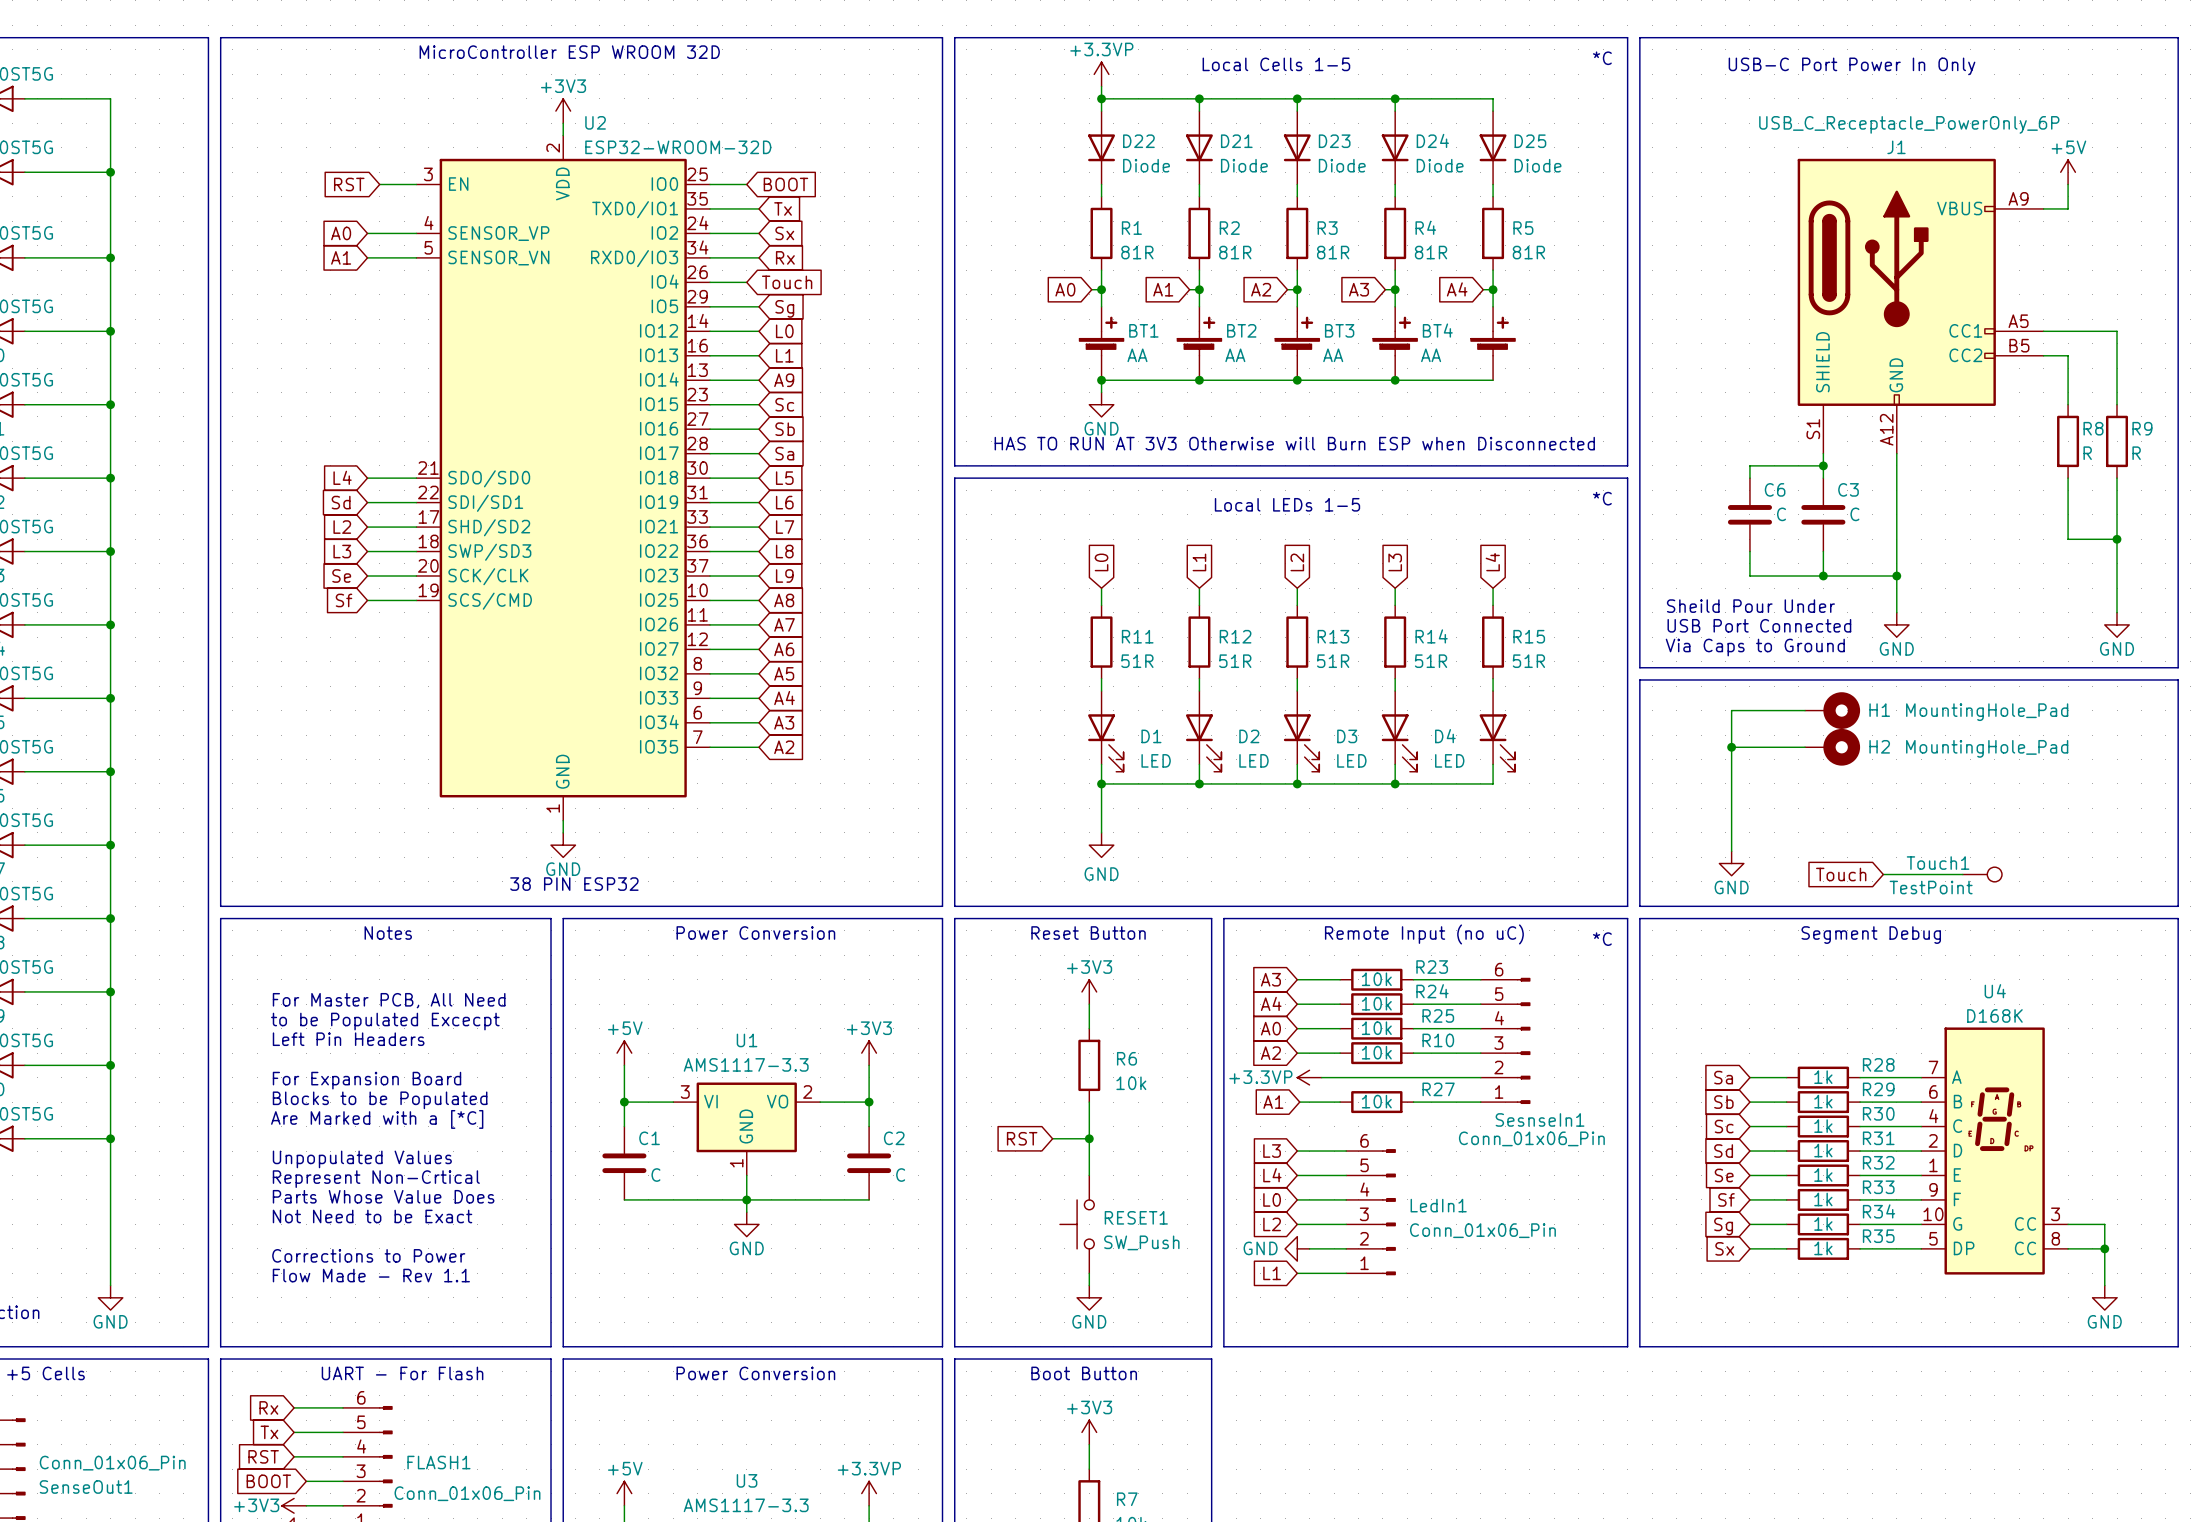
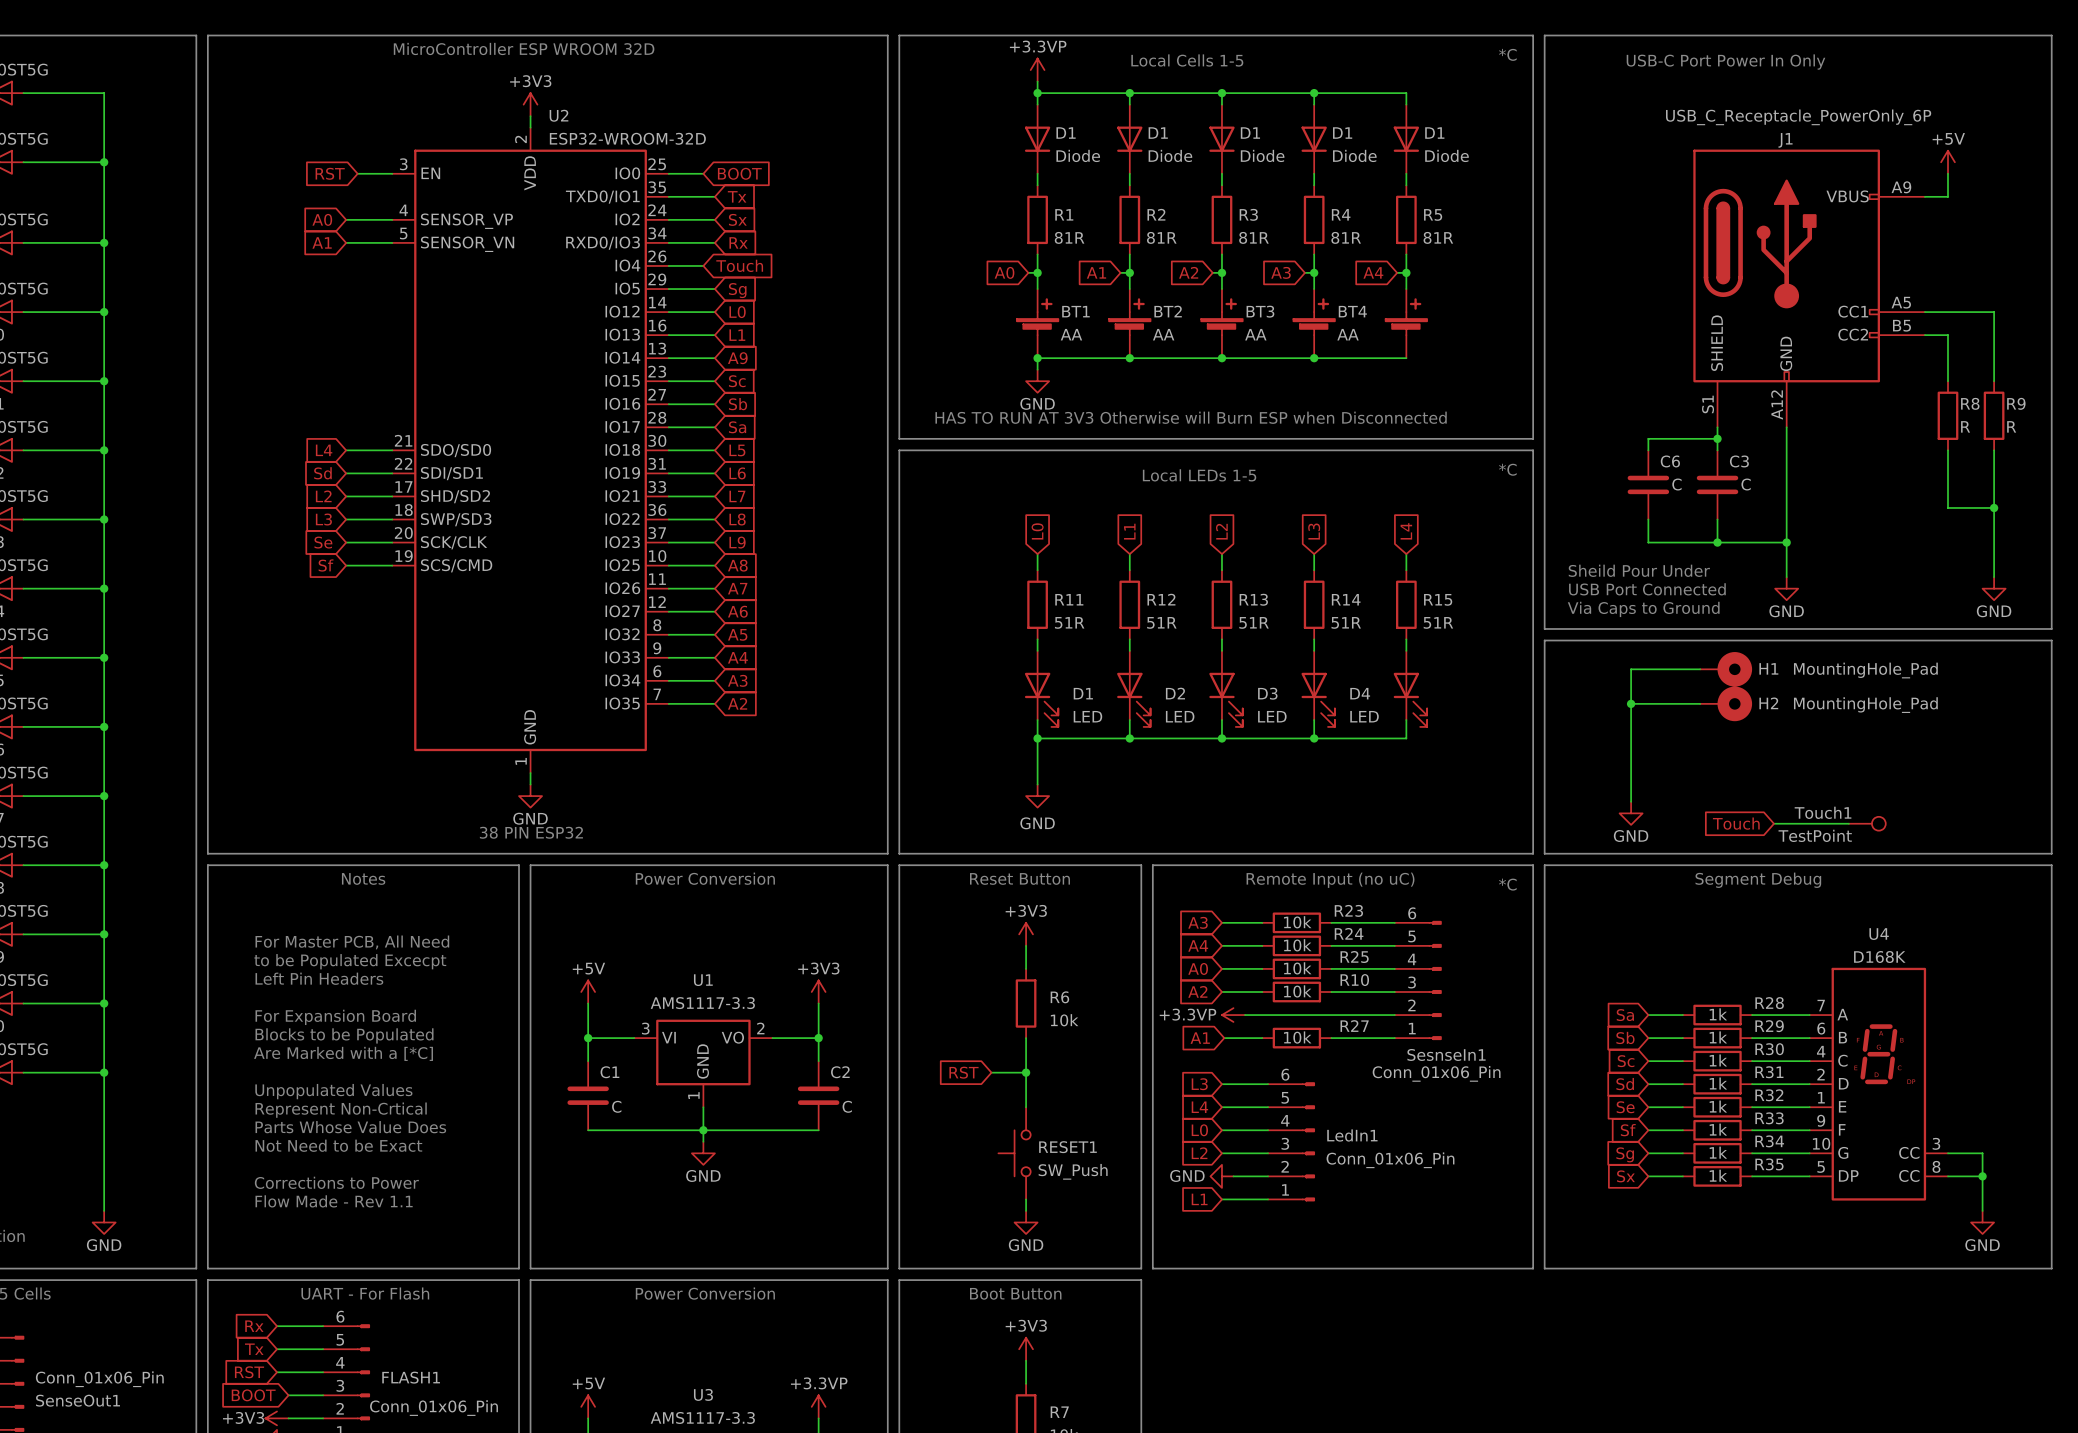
D24 name: D24 (1432, 140) -> D1 (1342, 133)
D22 name: D22 (1138, 141) -> D1 (1066, 133)
D21 name: D21 (1236, 141) -> D1 (1158, 133)
D23 name: D23 (1334, 141) -> D1 (1250, 133)
D25 name: D25 (1530, 141) -> D1 (1434, 133)

